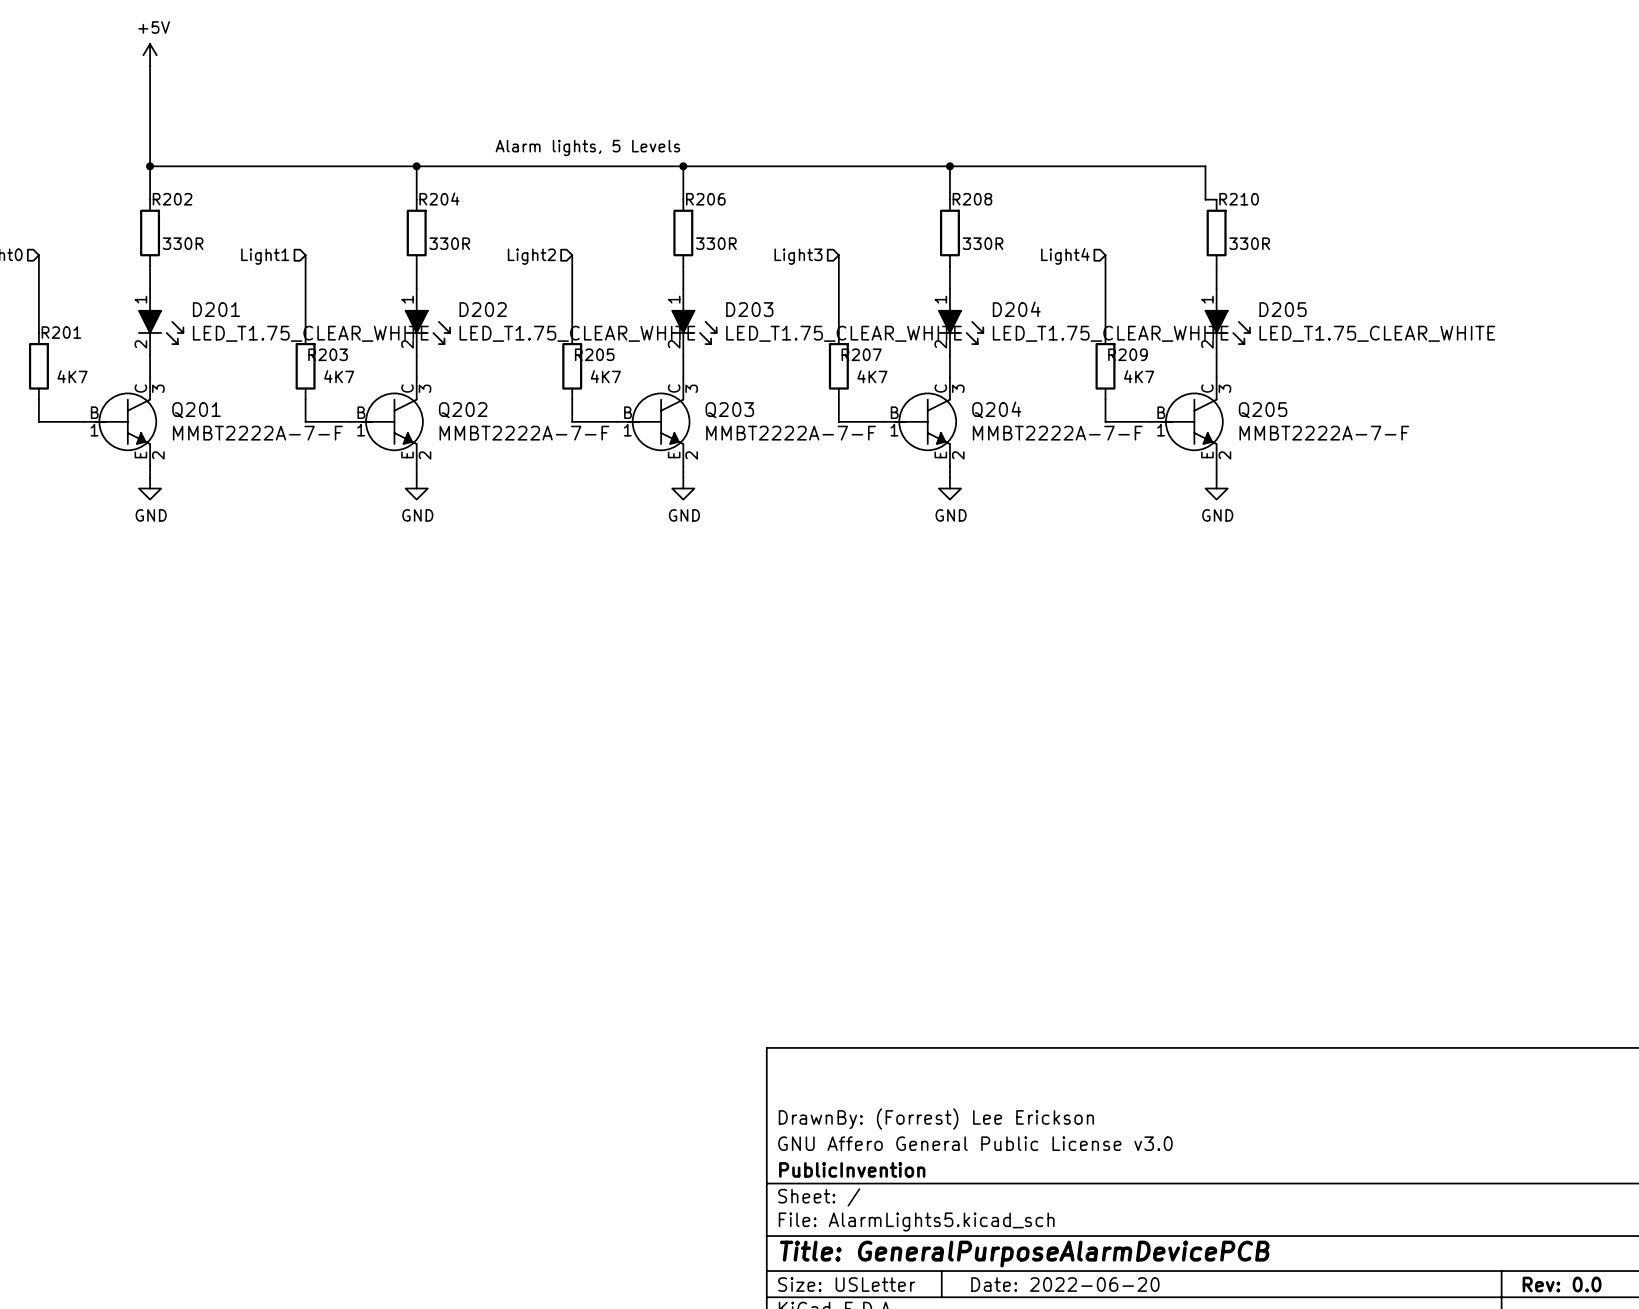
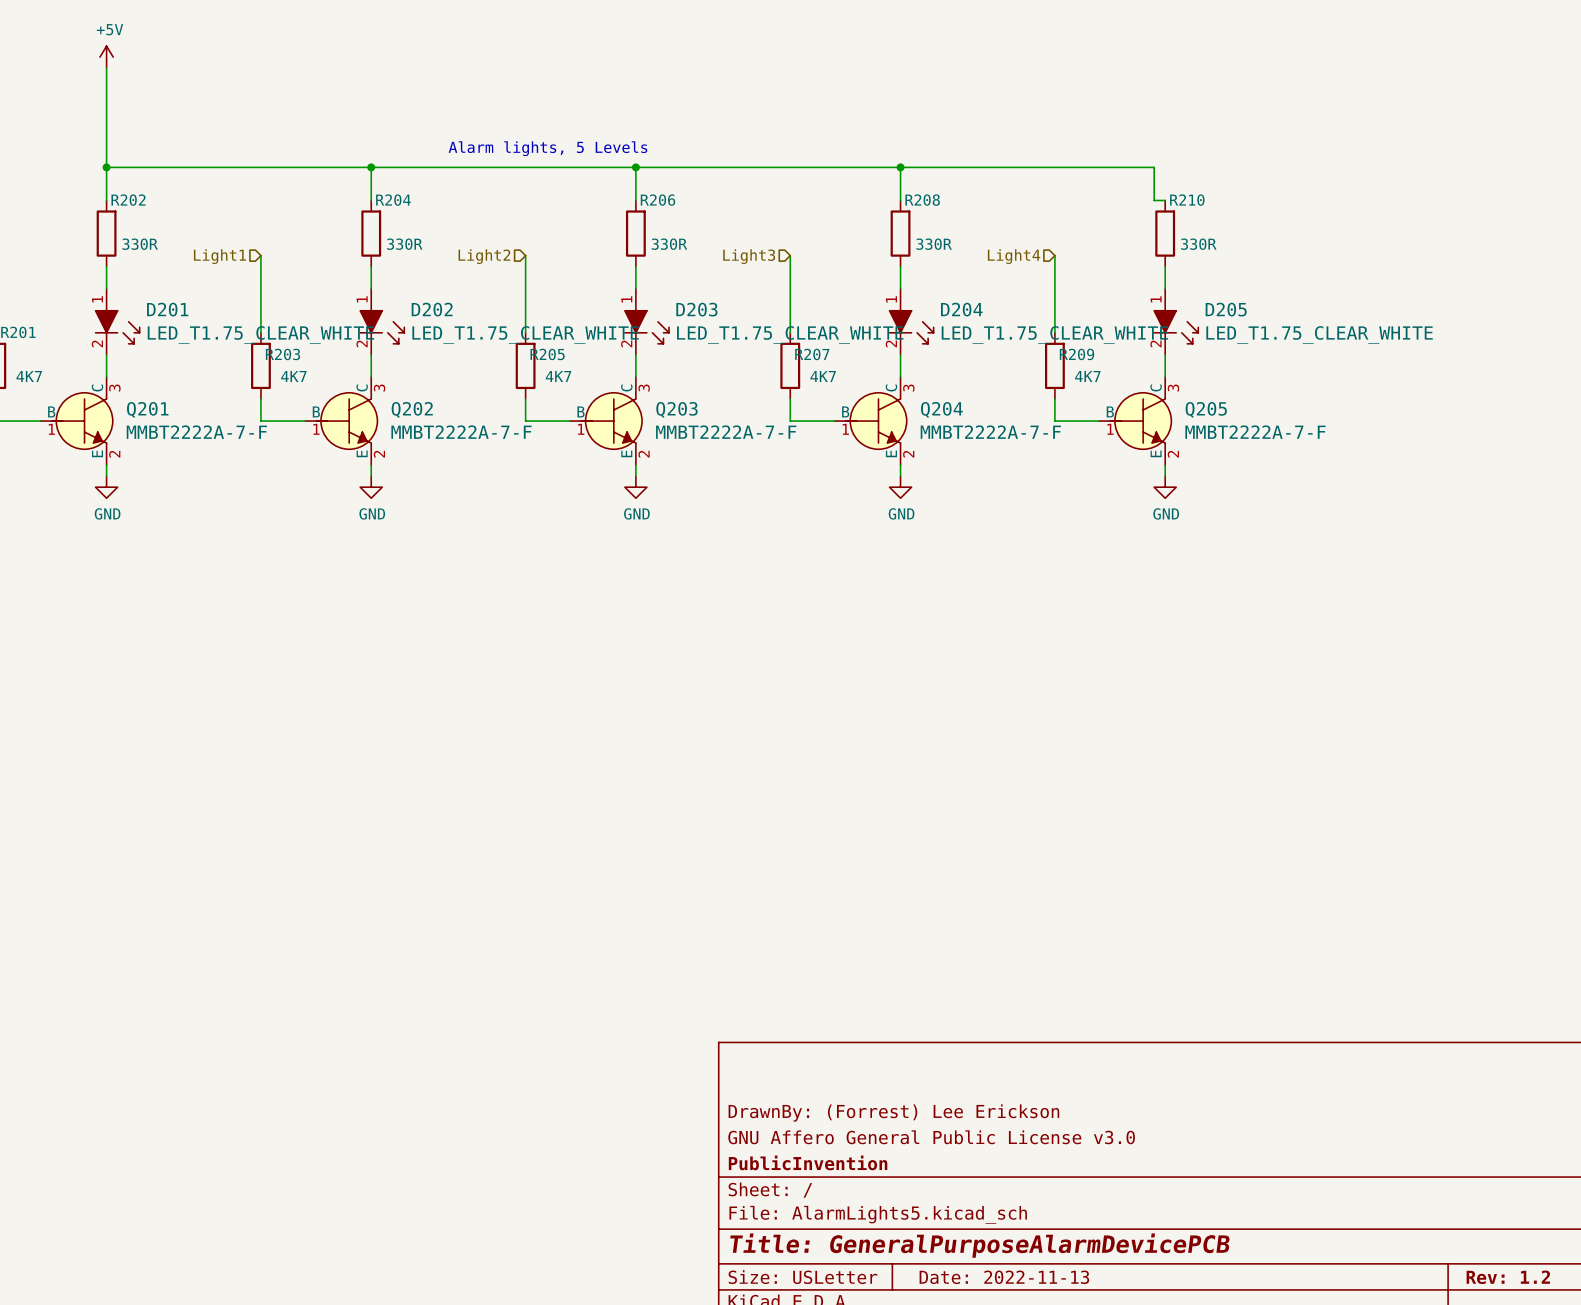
title block: Date: 2022-06-20 (1065, 1284) -> Date: 2022-11-13 (1004, 1277)
title block: Rev: 0.0 (1562, 1284) -> Rev: 1.2 (1508, 1277)

